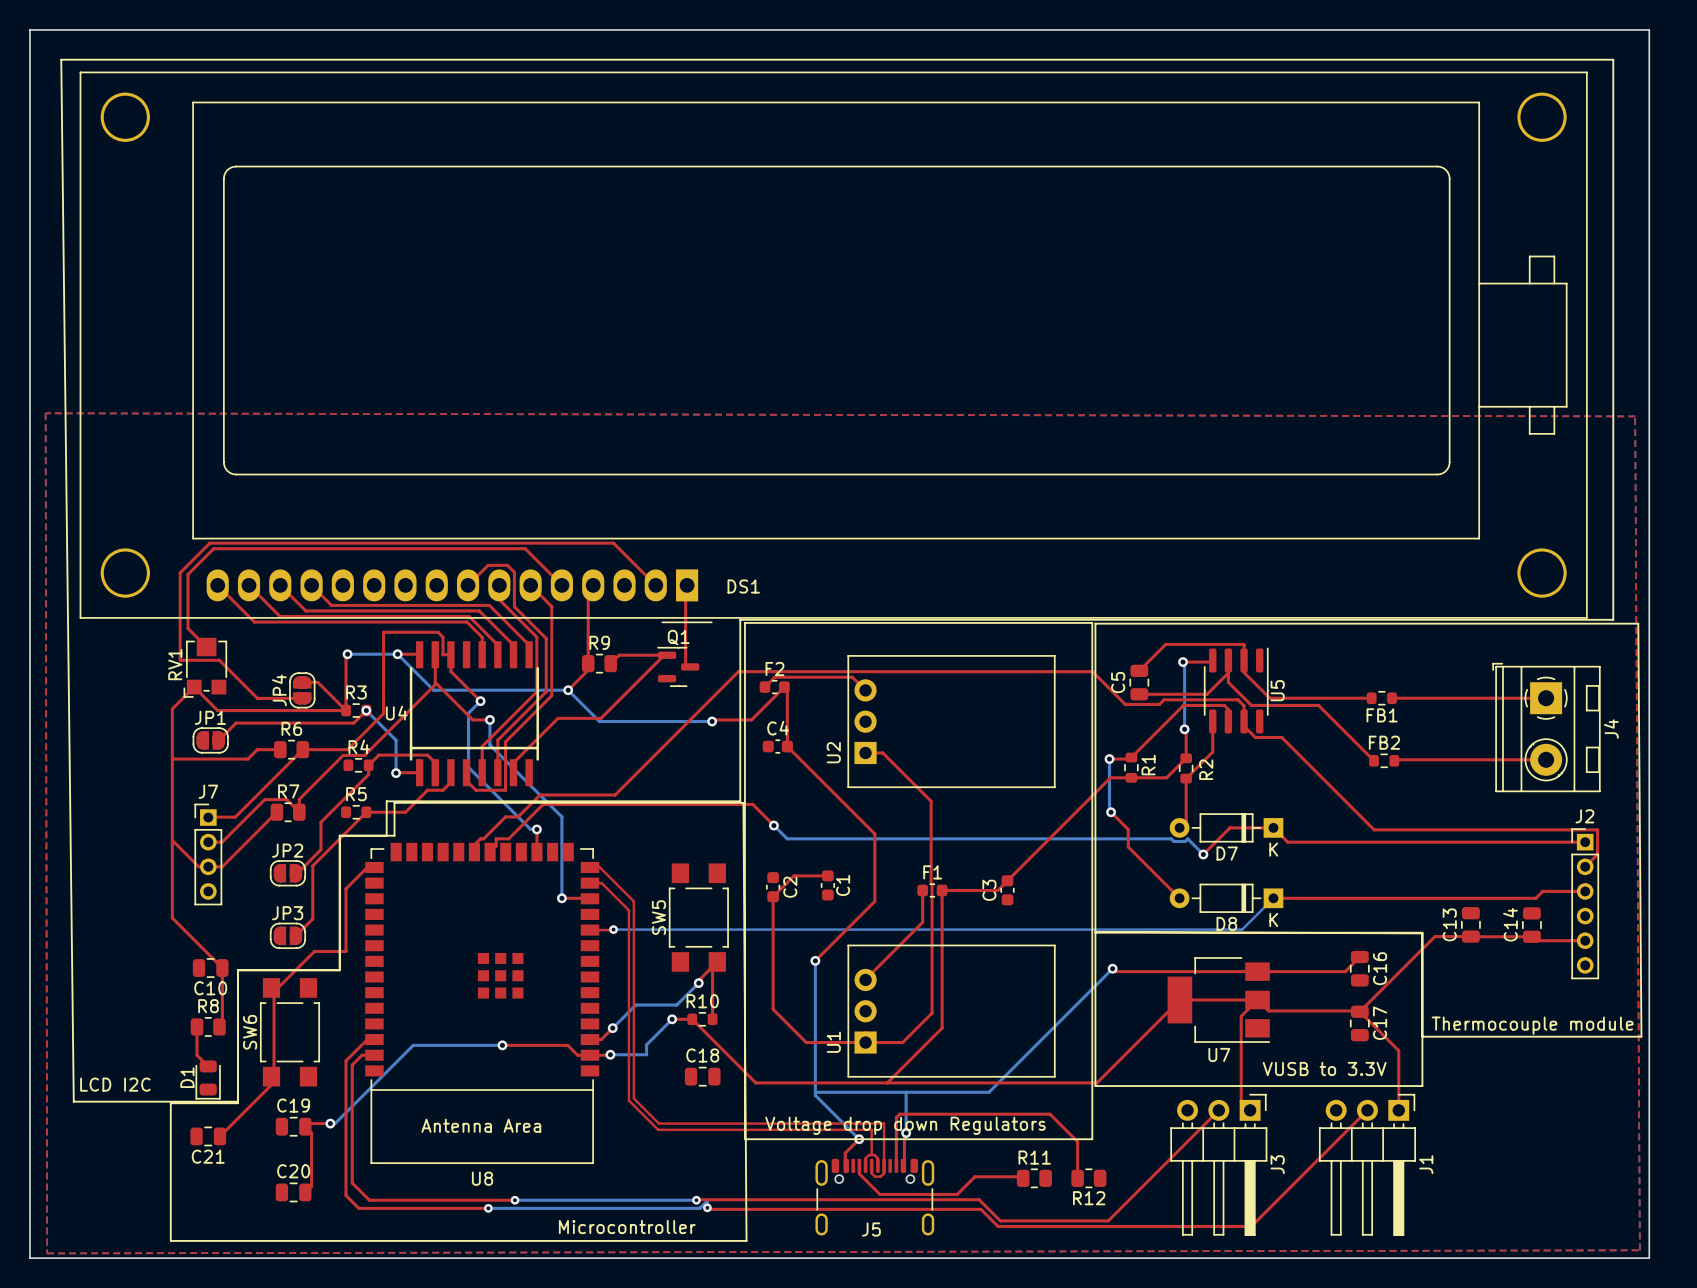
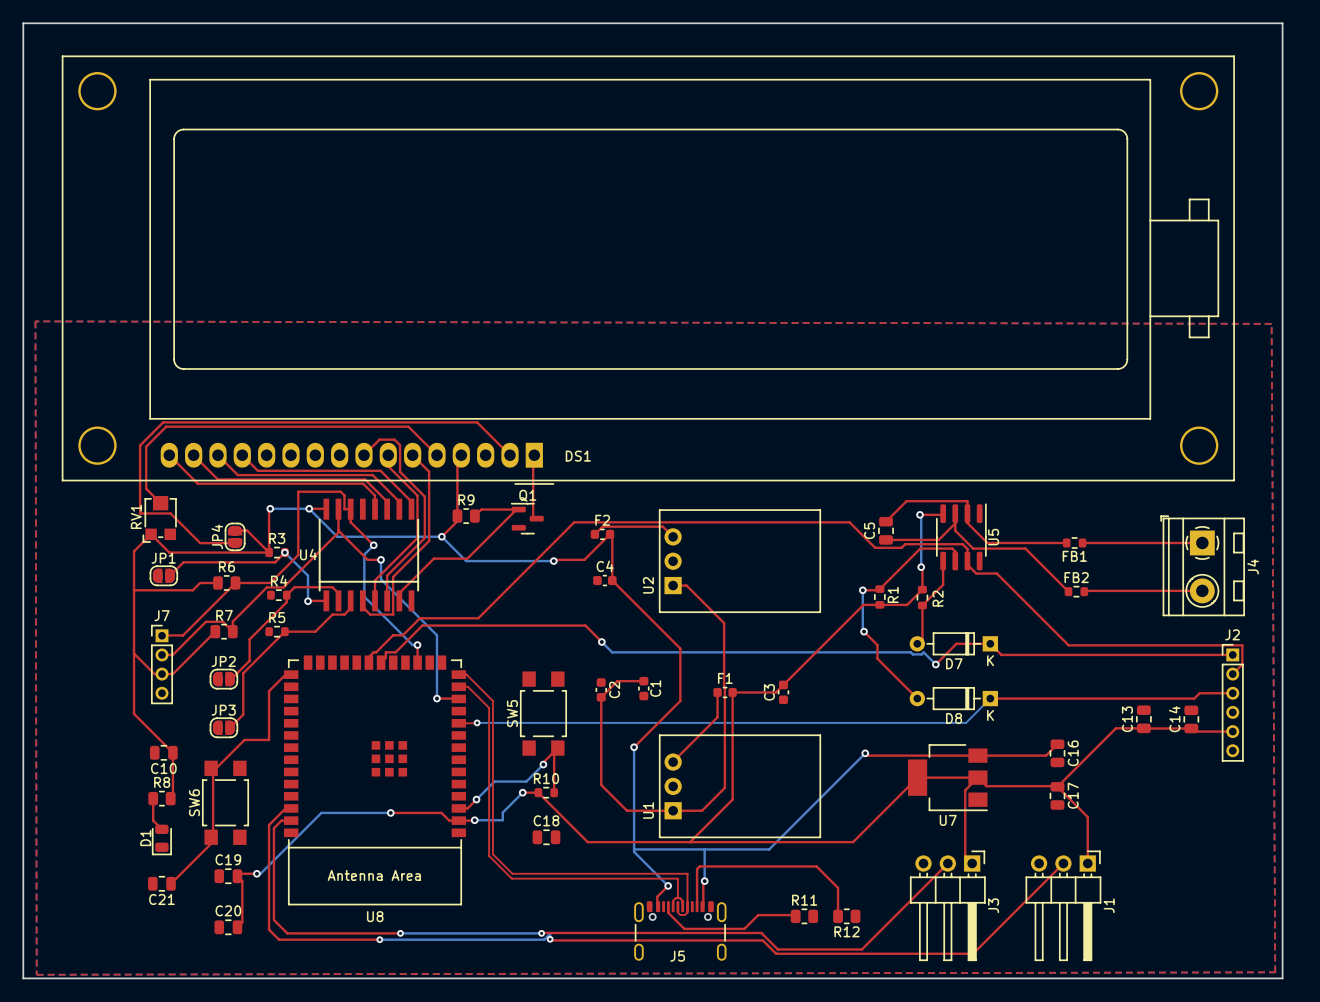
line: (744, 622) (1092, 622) (1092, 1139) (744, 1139) (744, 622) -> none
line: (394, 802) (394, 835) (339, 835) (339, 970) (238, 970) (238, 1103) (170, 1103) (170, 1240) (746, 1240) (743, 802) (394, 802) -> none
line: (386, 835) (386, 801) (740, 801) (740, 619) (1613, 619) (1613, 59) (61, 59) (73, 1101) (238, 1101) -> none
line: (1095, 932) (1422, 932) (1422, 1086) (1095, 1086) (1095, 932) -> none
line: (1422, 933) (1095, 931) (1095, 623) (1638, 623) (1641, 1036) (1422, 1036) -> none
text: Thermocouple module (1532, 1025) -> none
text: VUSB to 3.3V (1324, 1068) -> none
text: LCD I2C (115, 1084) -> none
text: Voltage drop down Regulators (905, 1125) -> none
text: Microcontroller (627, 1227) -> none

